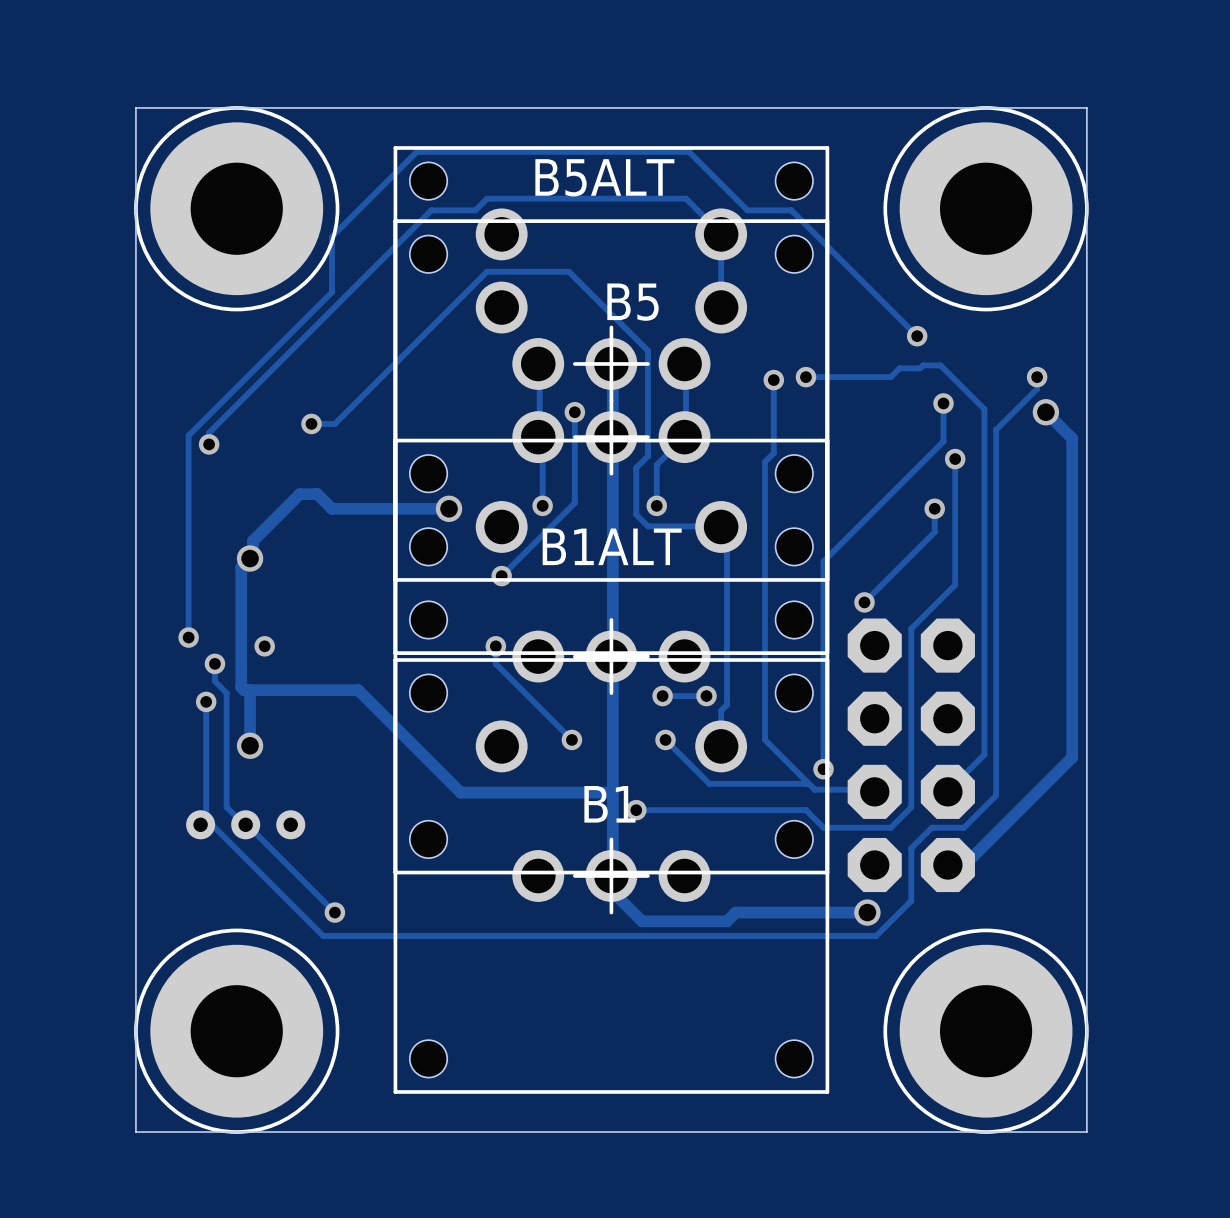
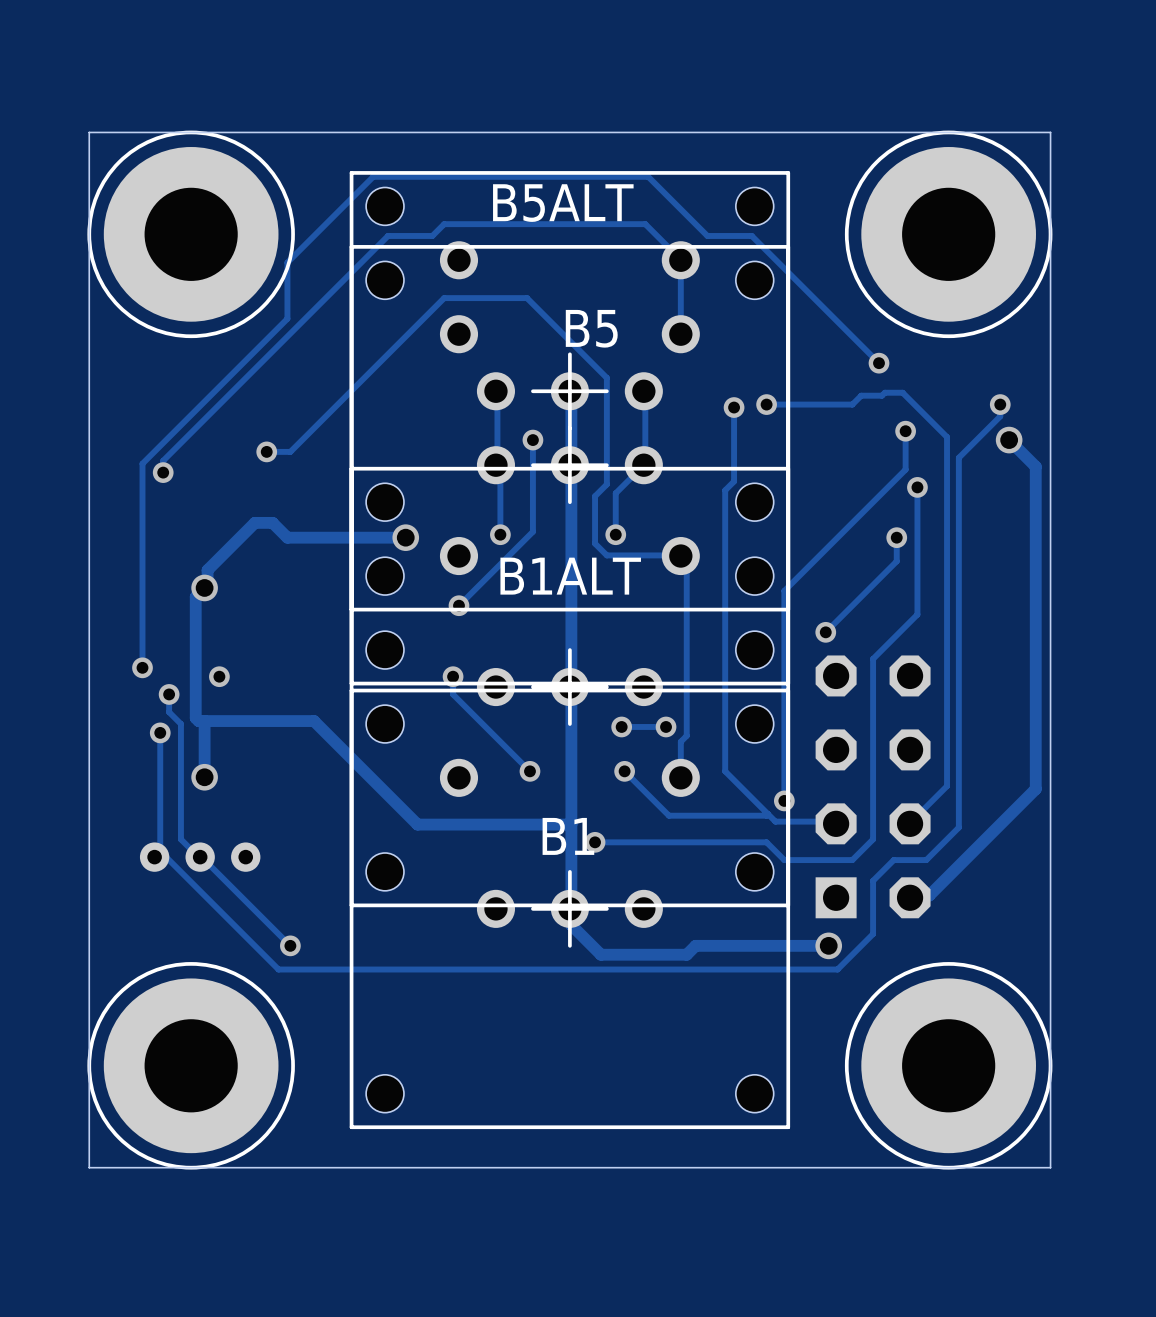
B5ALT footprint: [393, 146, 830, 582] -> [349, 171, 791, 612]
B5 footprint: [393, 219, 830, 655] -> [349, 245, 791, 686]
B1ALT footprint: [393, 438, 830, 875] -> [349, 466, 791, 908]
part footprint: [847, 618, 975, 893] -> [815, 655, 931, 919]
B1 footprint: [393, 658, 830, 1094] -> [349, 688, 791, 1130]

